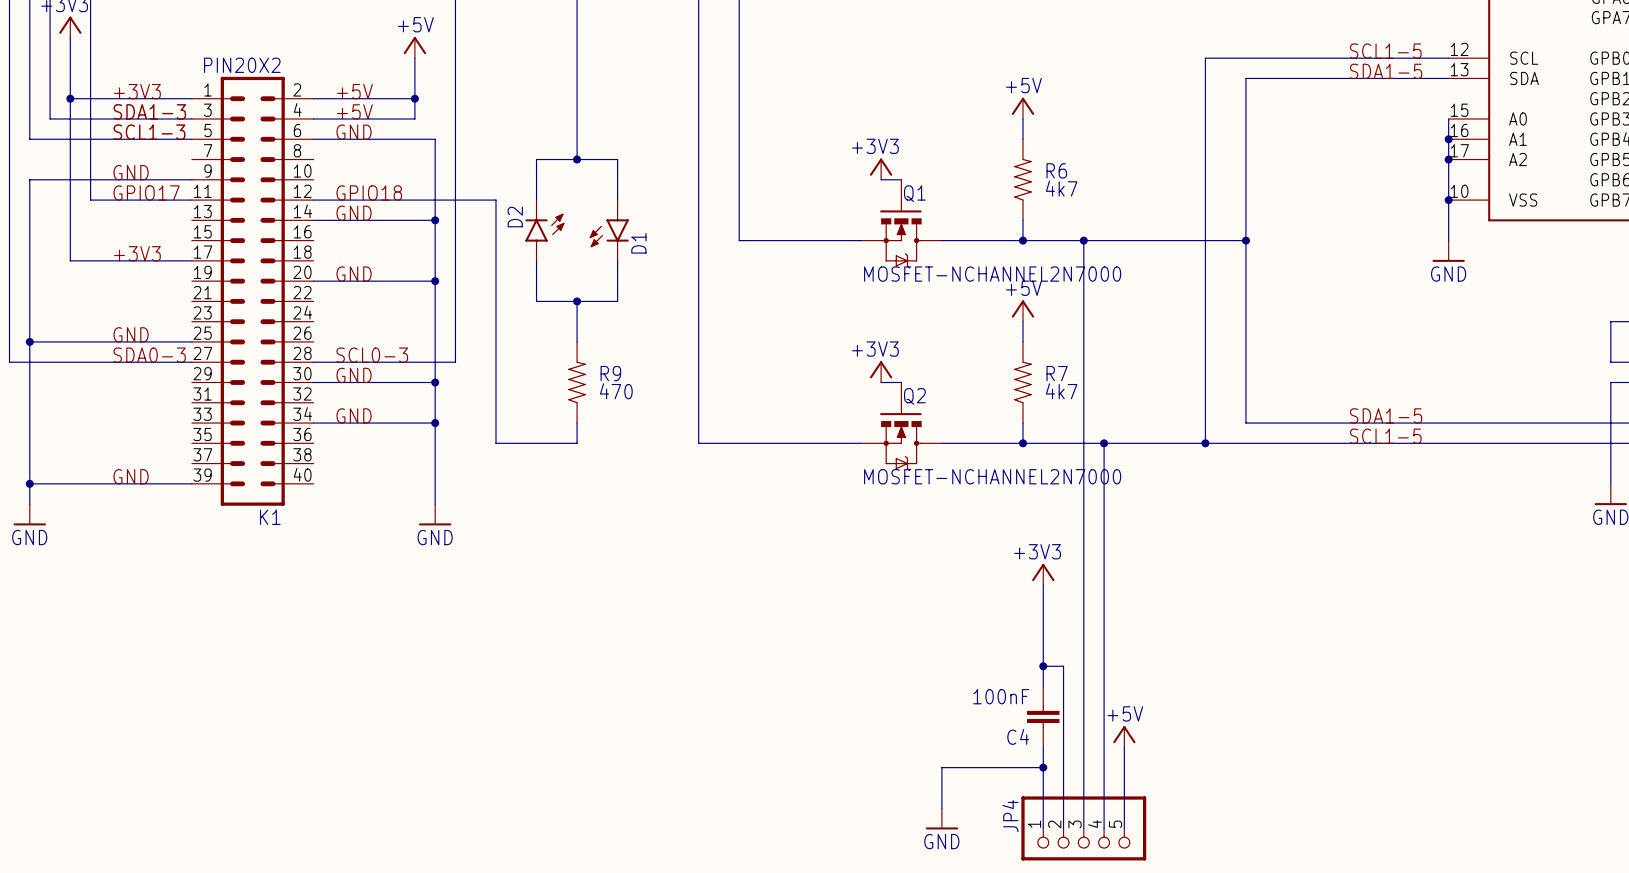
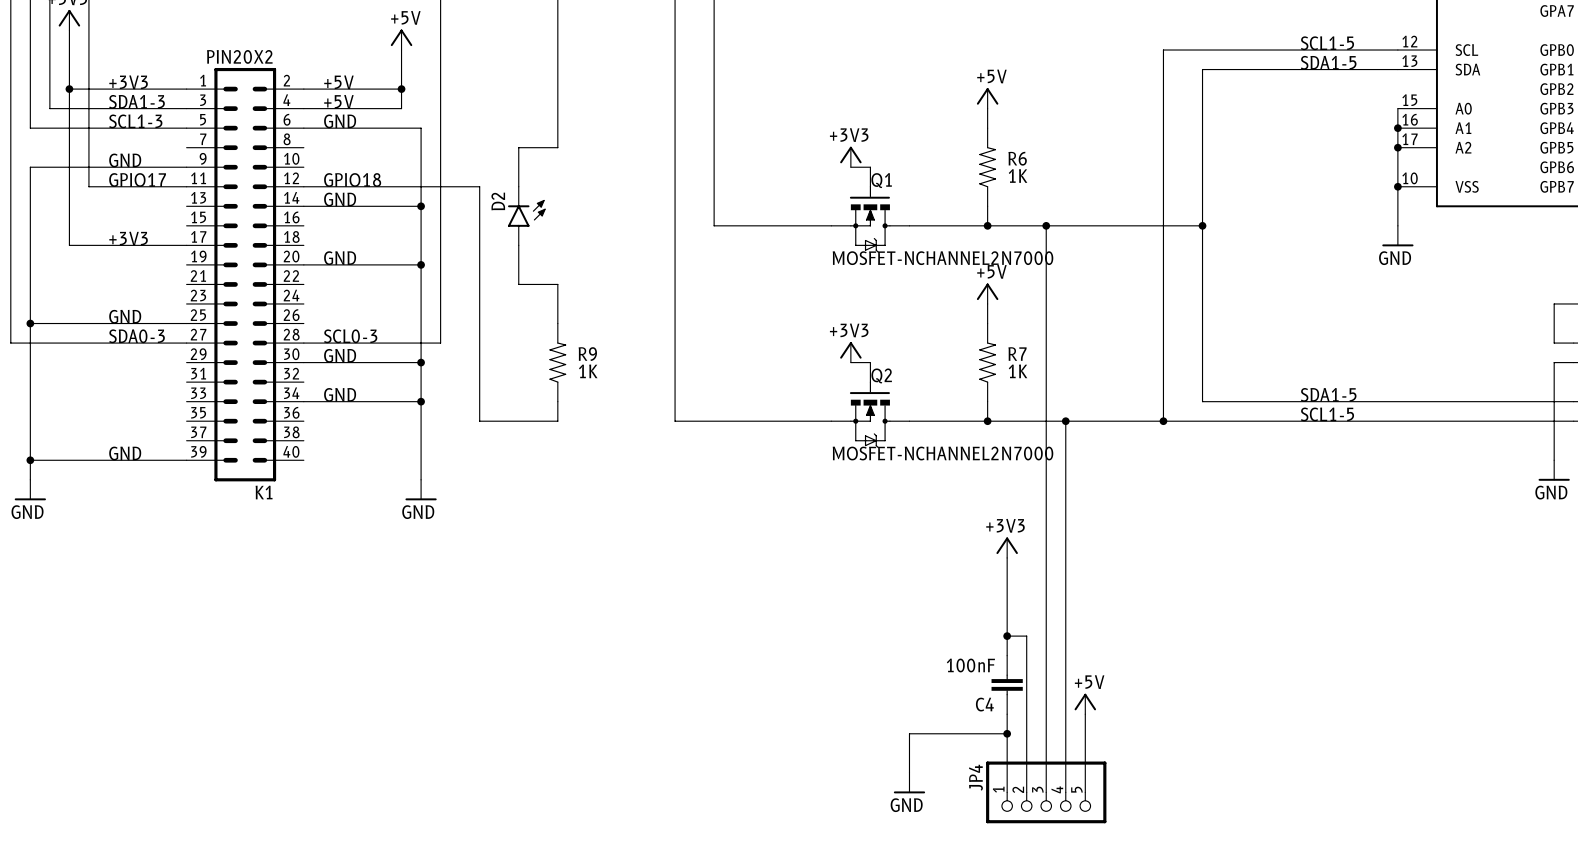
wire: (577, 159) (617, 159) (617, 200) -> none
junction: (577, 159) -> none
R6 value: 4k7 (1061, 188) -> 1K (1018, 176)
D1: (609, 230) -> none
wire: (617, 260) (617, 301) (577, 301) -> none
junction: (577, 301) -> none
R9 value: 470 (616, 391) -> 1K (588, 371)
R7 value: 4k7 (1061, 391) -> 1K (1018, 371)

